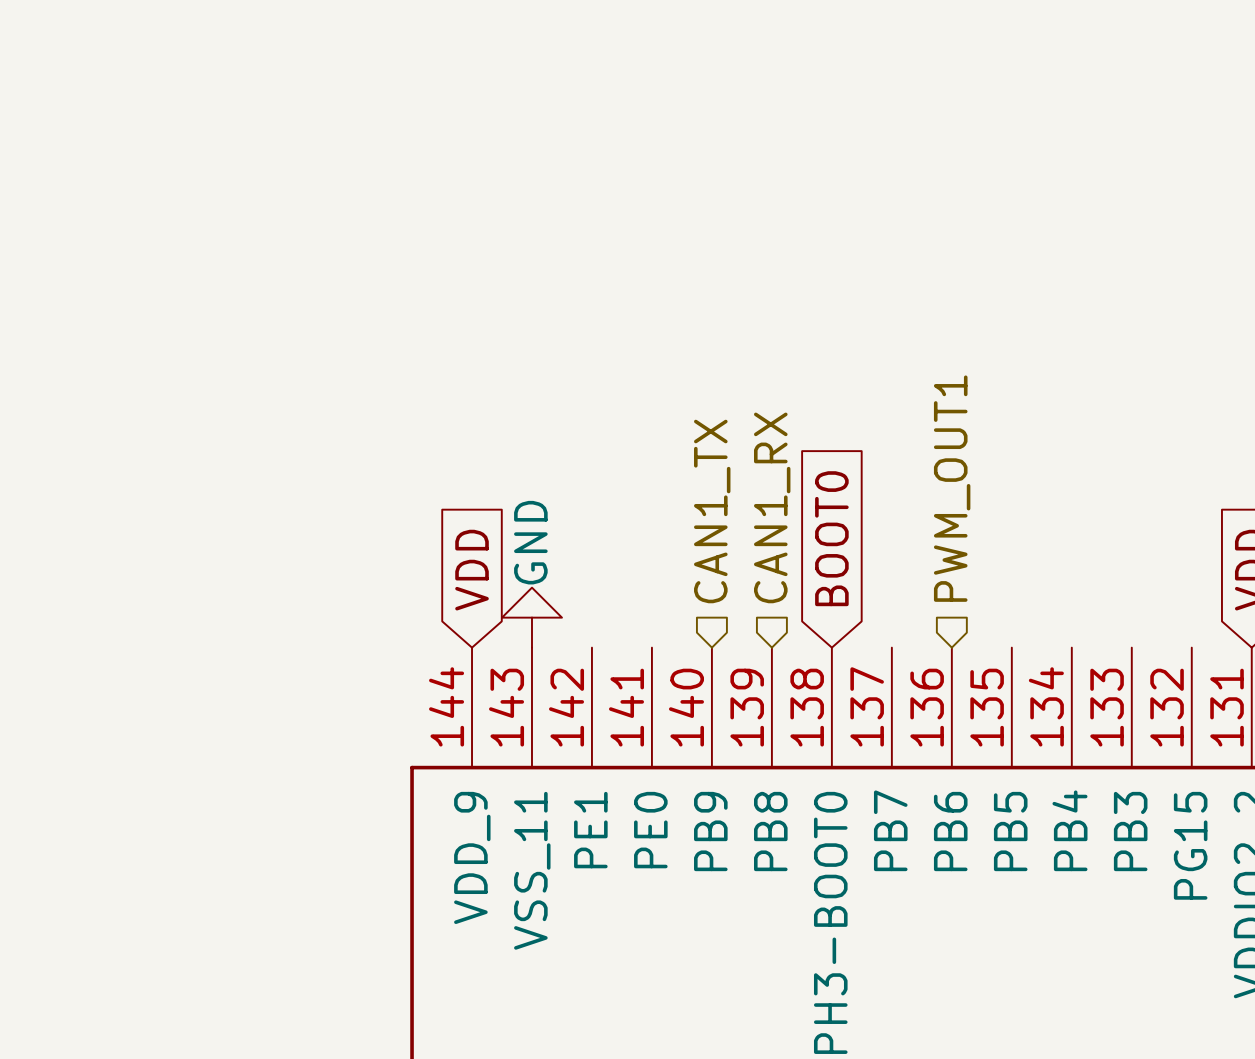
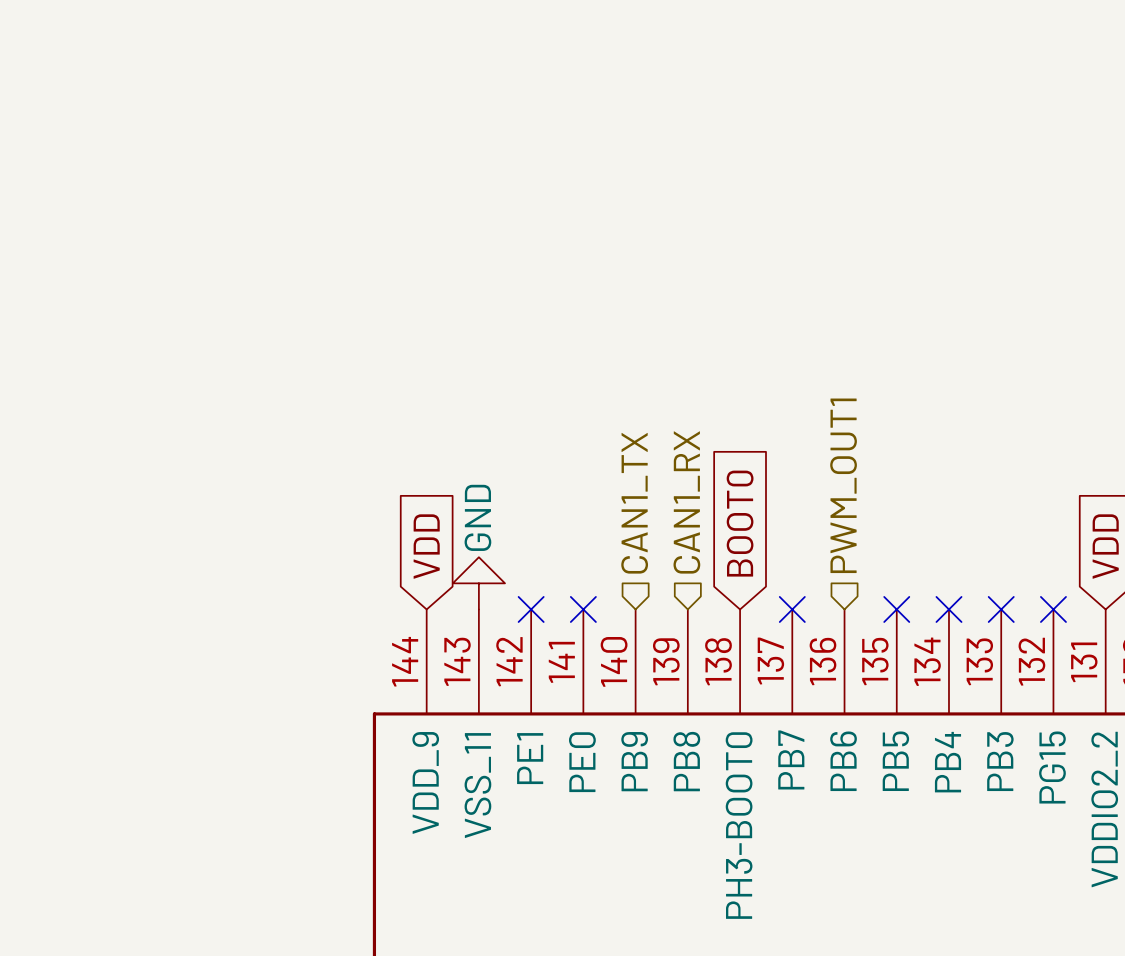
no-connect mark: none -> (531, 609)
no-connect mark: none -> (583, 609)
no-connect mark: none -> (792, 609)
no-connect mark: none -> (896, 609)
no-connect mark: none -> (948, 609)
no-connect mark: none -> (1001, 609)
no-connect mark: none -> (1053, 609)

